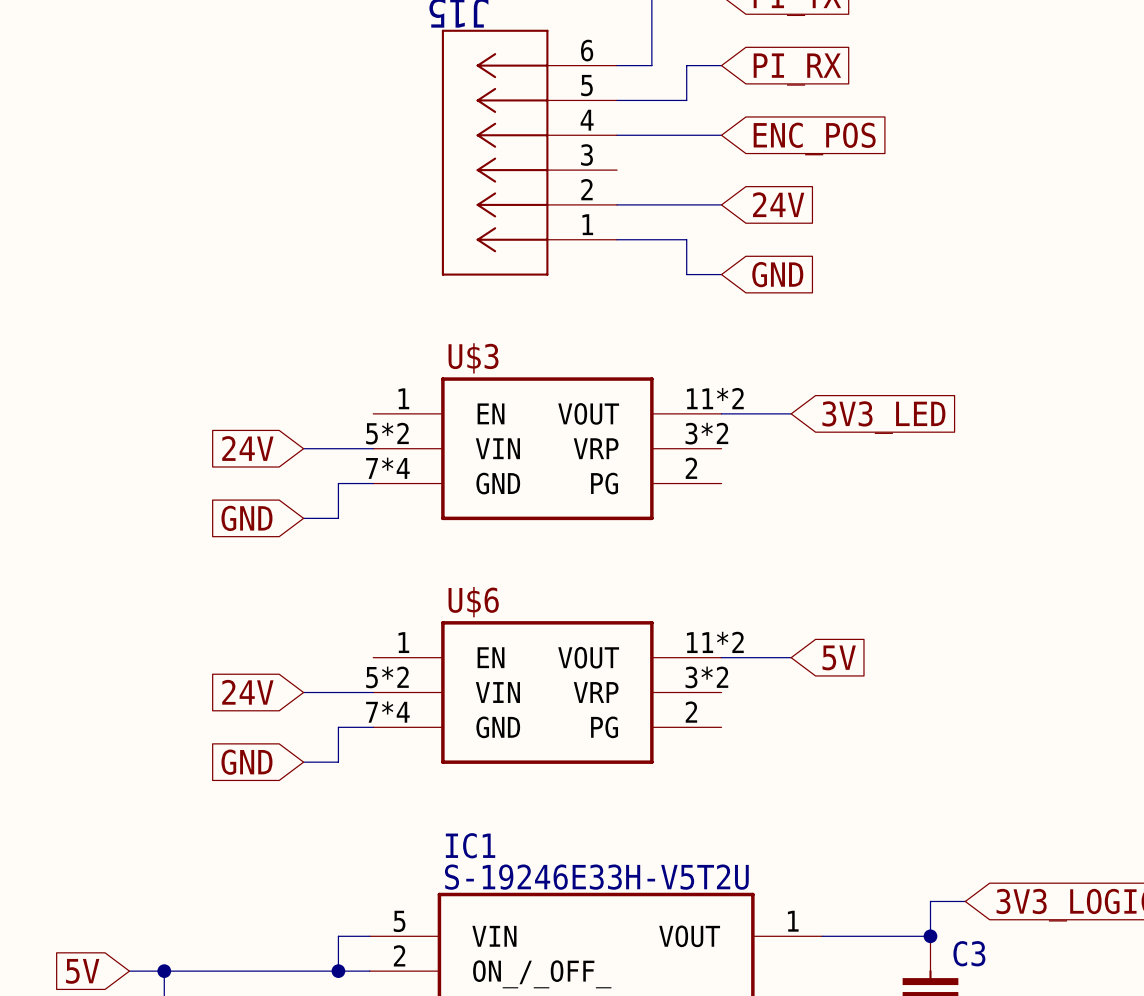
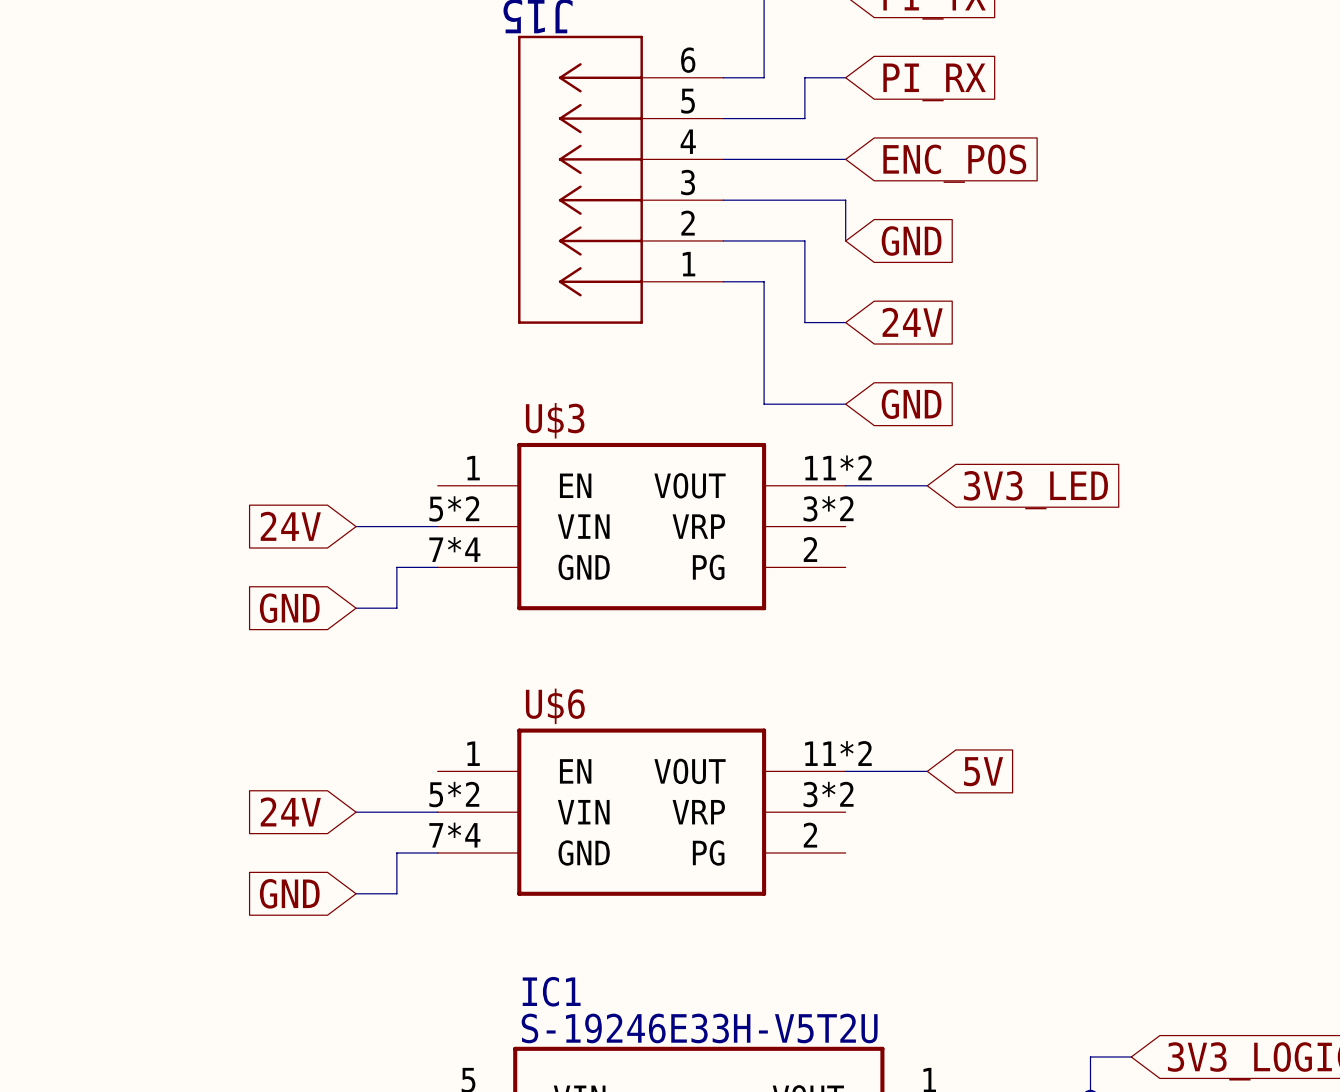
wire: none -> (723, 200) (845, 200) (845, 240)
wire: (686, 204) (721, 204) -> (804, 240) (804, 281)
global label: 24V (778, 204) -> GND (911, 241)
wire: (651, 239) (686, 239) -> (764, 281) (764, 404) (845, 404)
global label: GND (777, 274) -> 24V (912, 322)
global label: none -> GND (911, 404)

